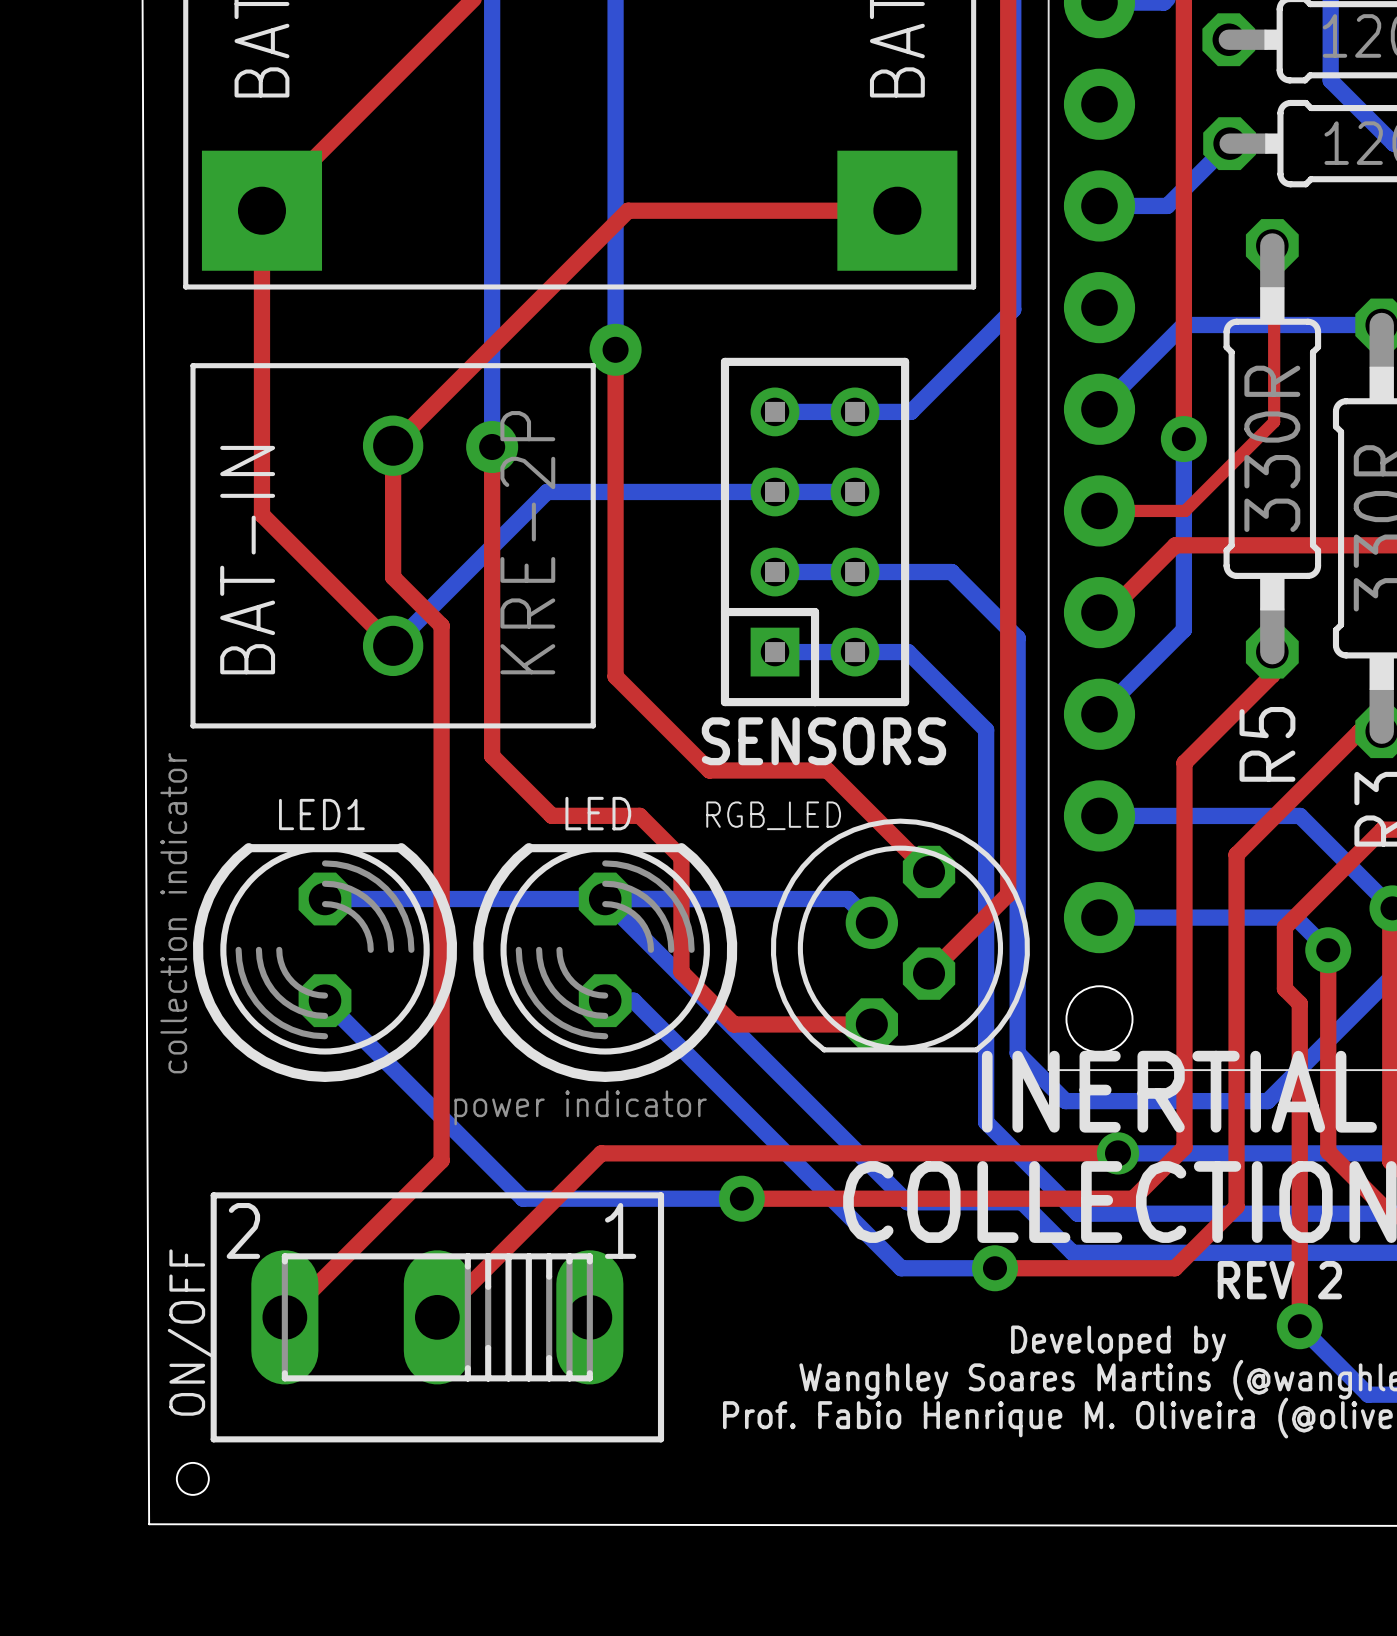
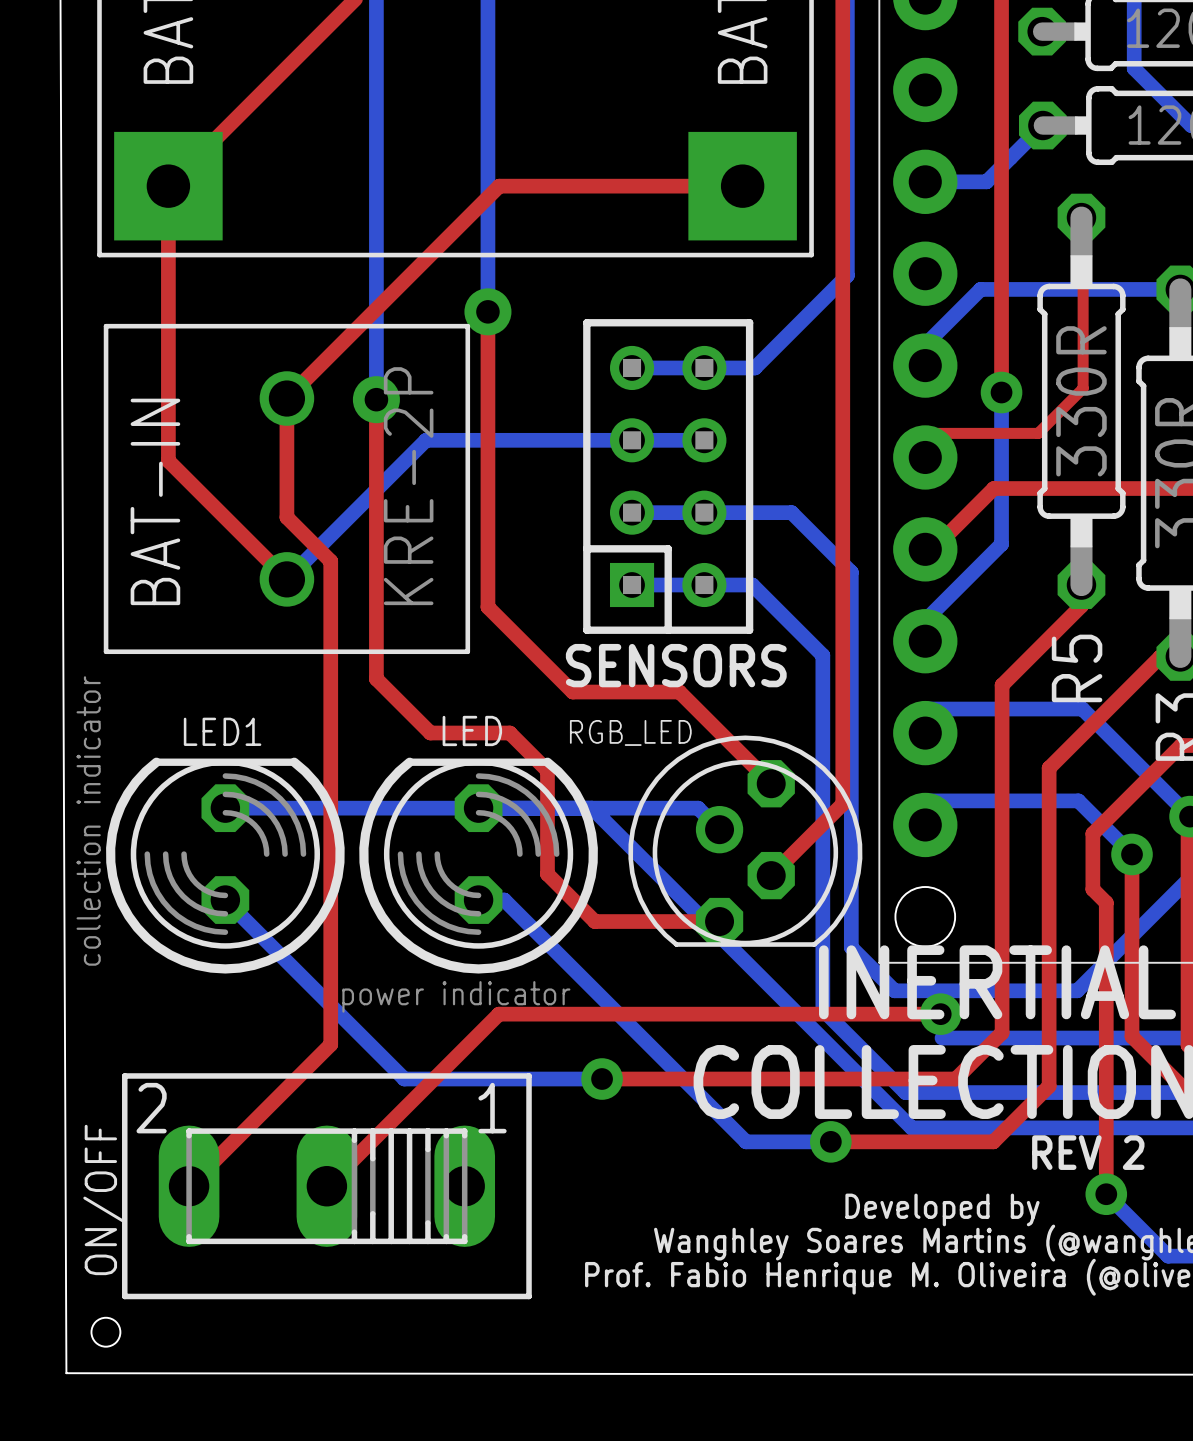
bottom track: (1183, 325) (1099, 409) -> (1001, 289) (980, 289) (928, 341)
top track: (1274, 421) (1185, 510) (1099, 510) -> (1083, 377) (1083, 388) (1038, 433) (928, 433)
bottom track: (1183, 606) (1183, 629) (1099, 714) -> (1001, 544) (928, 617)
bottom track: (1099, 815) (1300, 815) -> (928, 709) (1082, 709) (1106, 733)
bottom track: (605, 899) (907, 1202) (1022, 1202) (1072, 1252) (1084, 1252) -> (591, 808) (911, 1127)
bottom track: (1099, 917) (1295, 917) -> (928, 800) (1078, 800) (1102, 824)
top track: (601, 1153) (1118, 1153) -> (475, 1038) (498, 1014) (940, 1014)
via position: (1118, 1153) -> (940, 1014)

